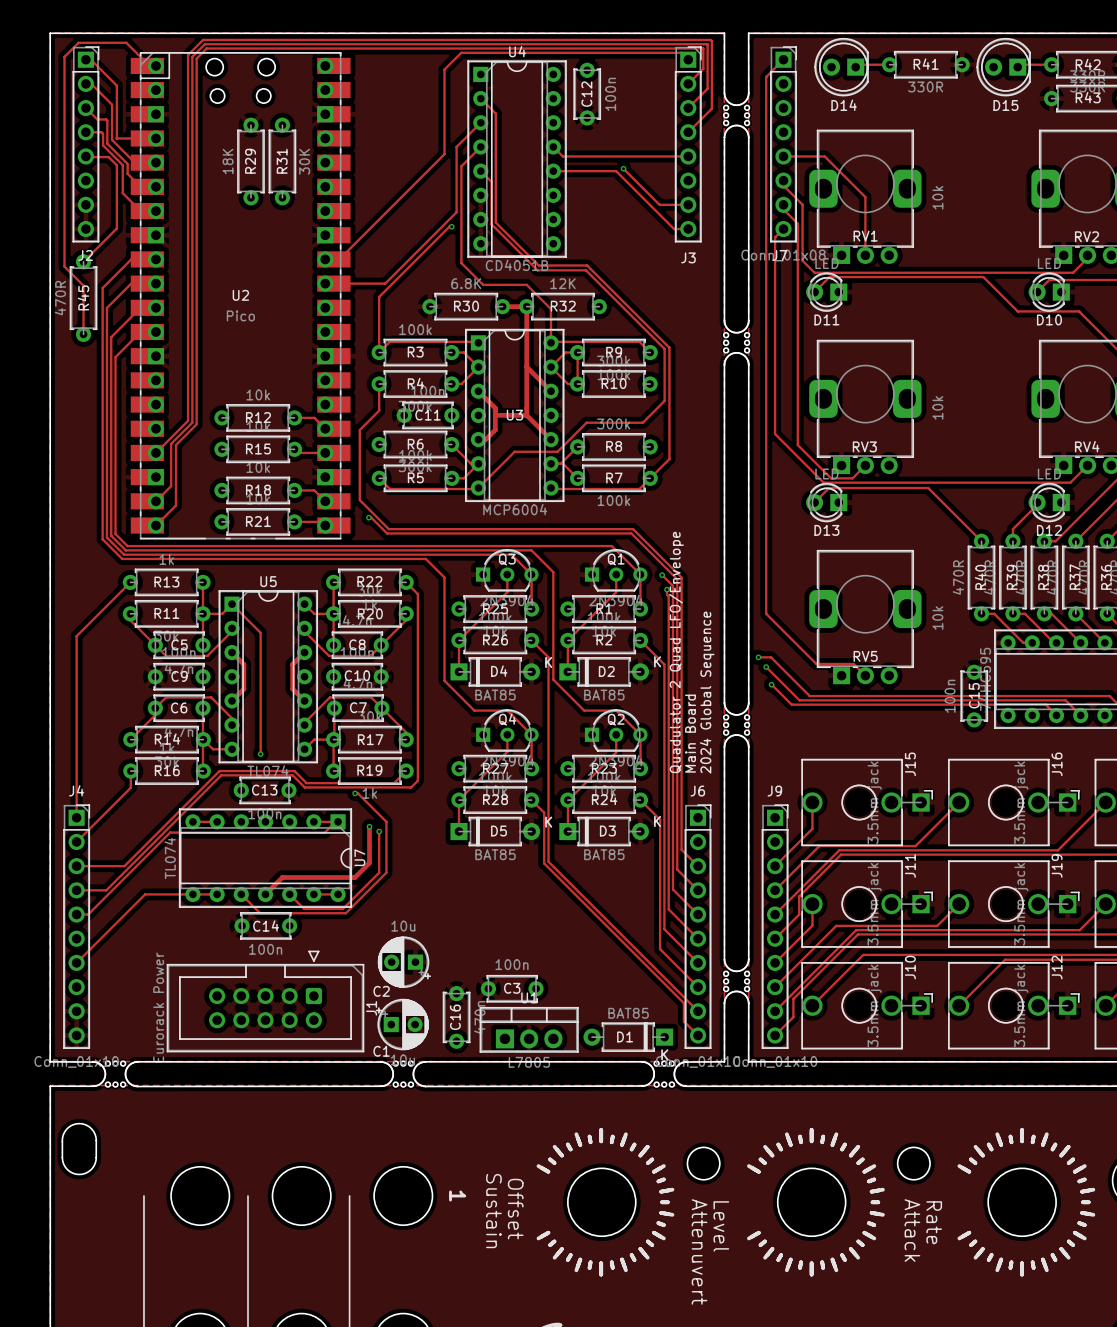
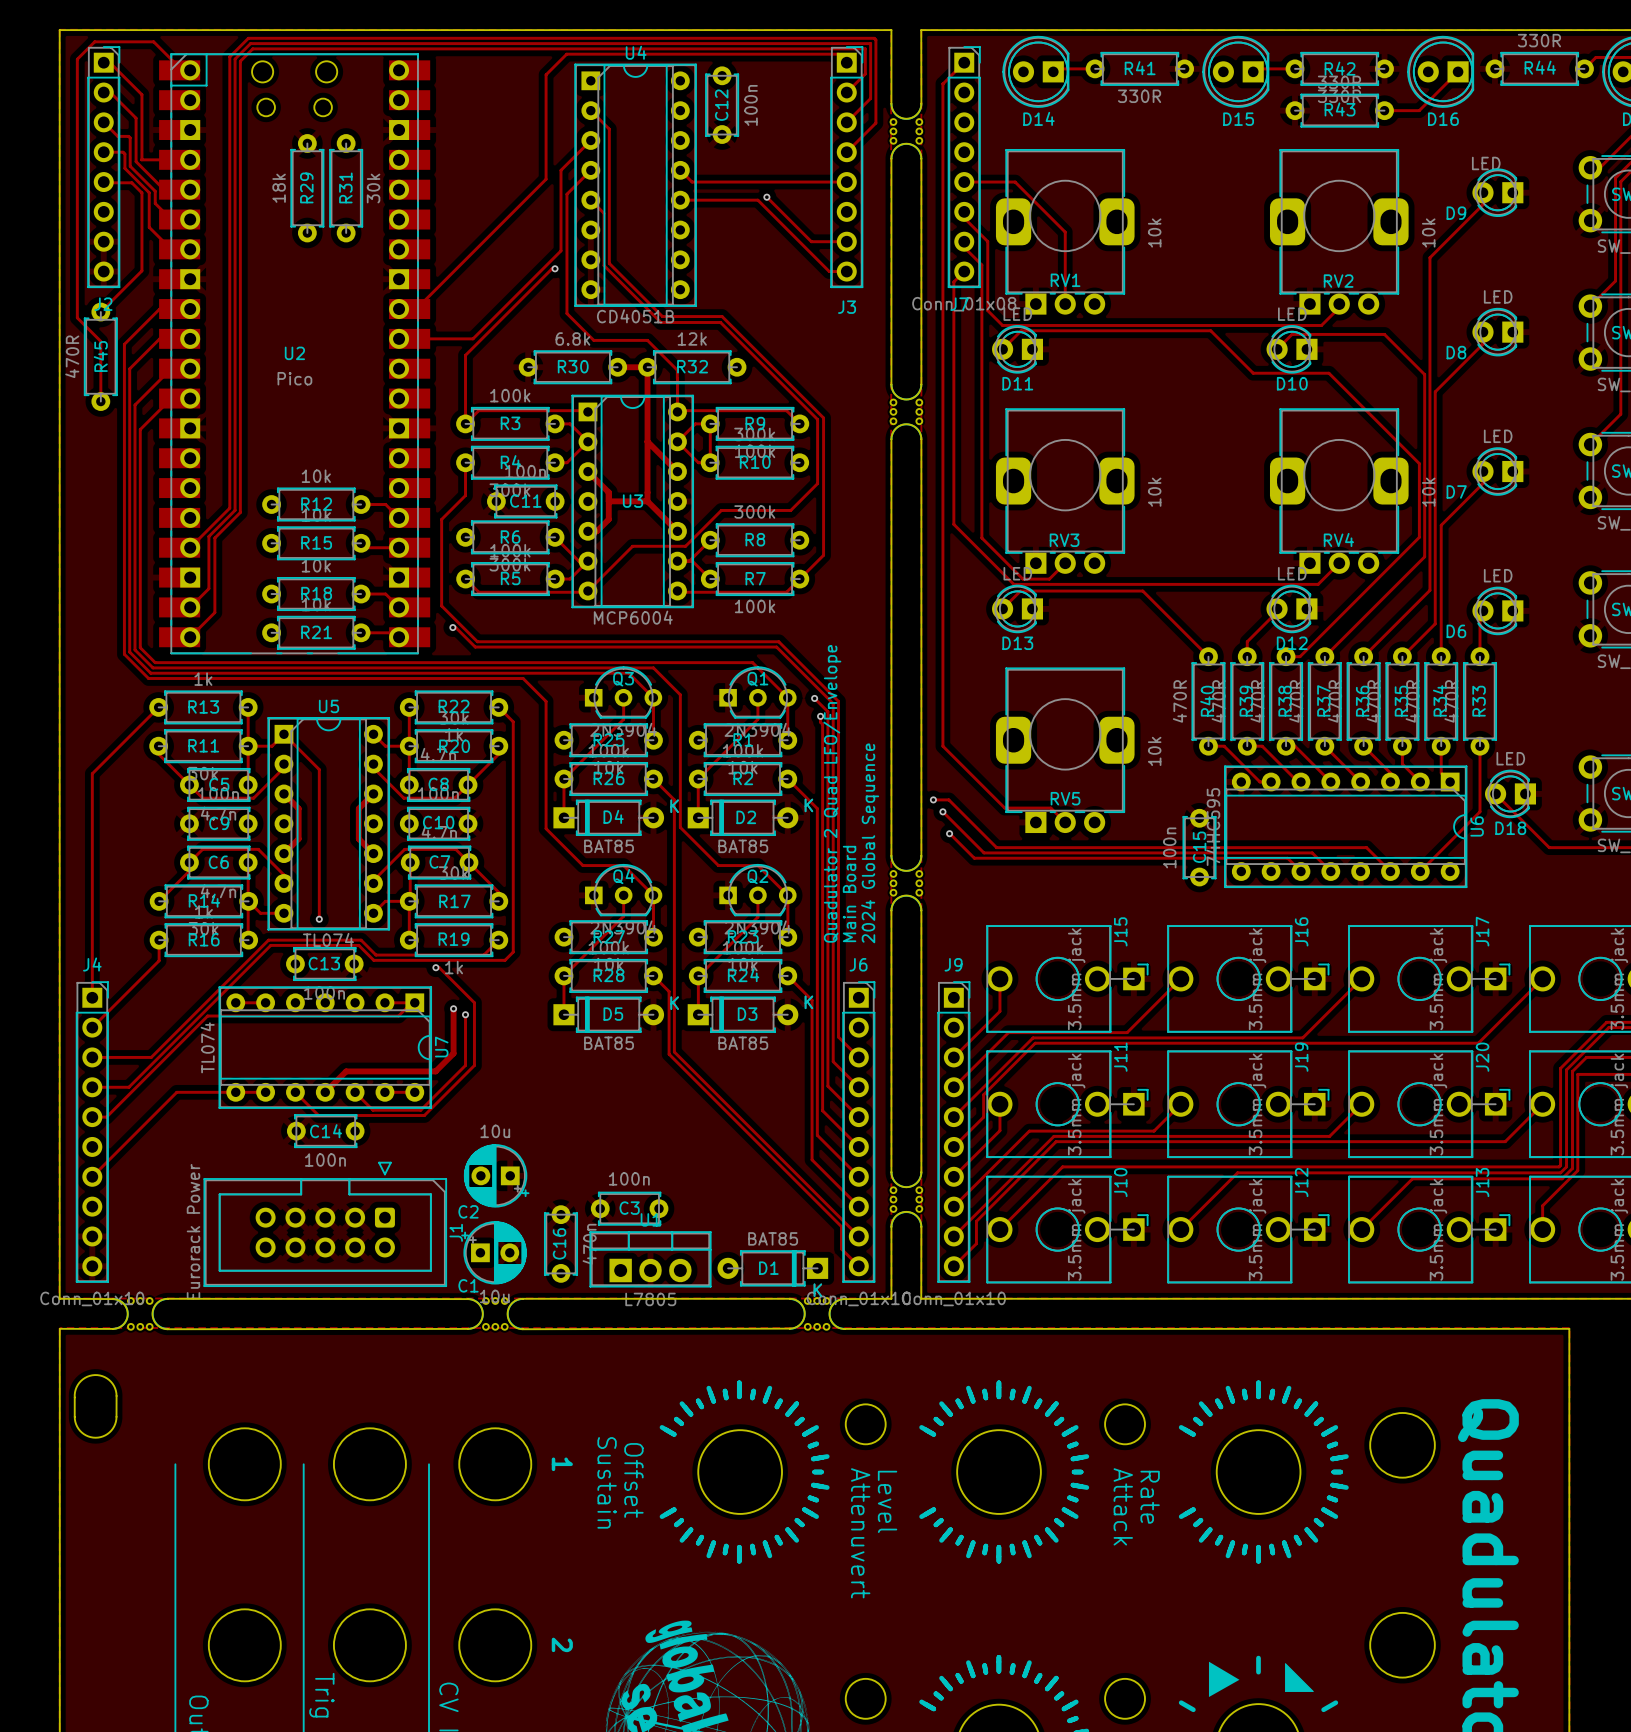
R29 value: 18K (228, 161) -> 18k (279, 188)
R31 value: 30K (304, 161) -> 30k (373, 188)
R30 value: 6.8K (466, 283) -> 6.8k (572, 338)
R32 value: 12K (563, 283) -> 12k (692, 338)

